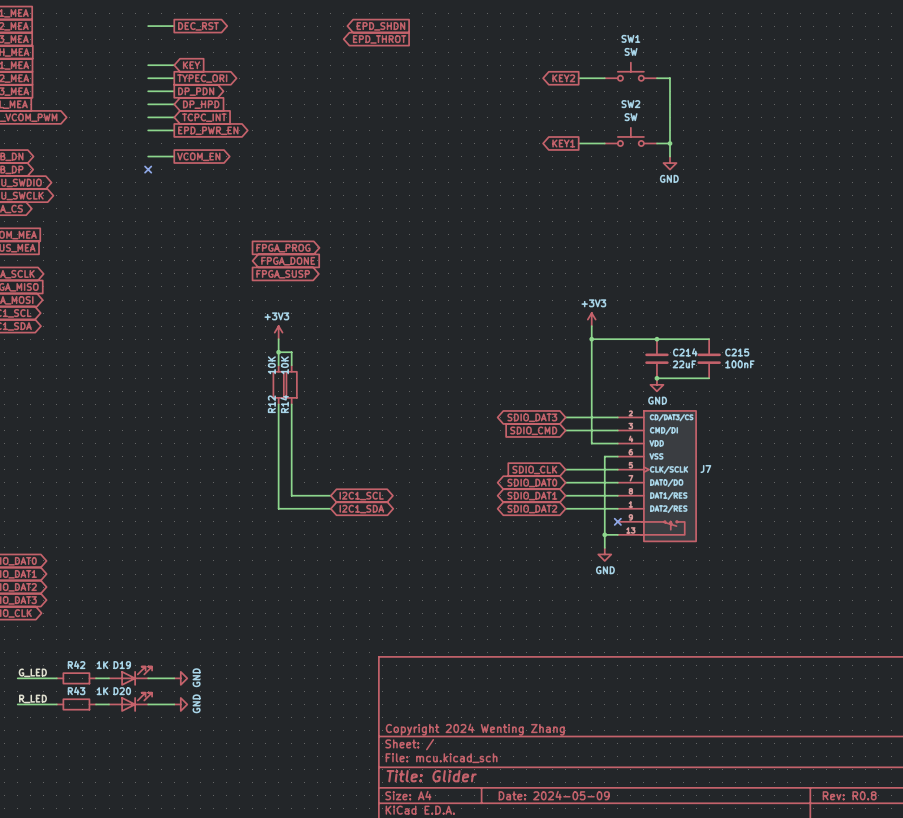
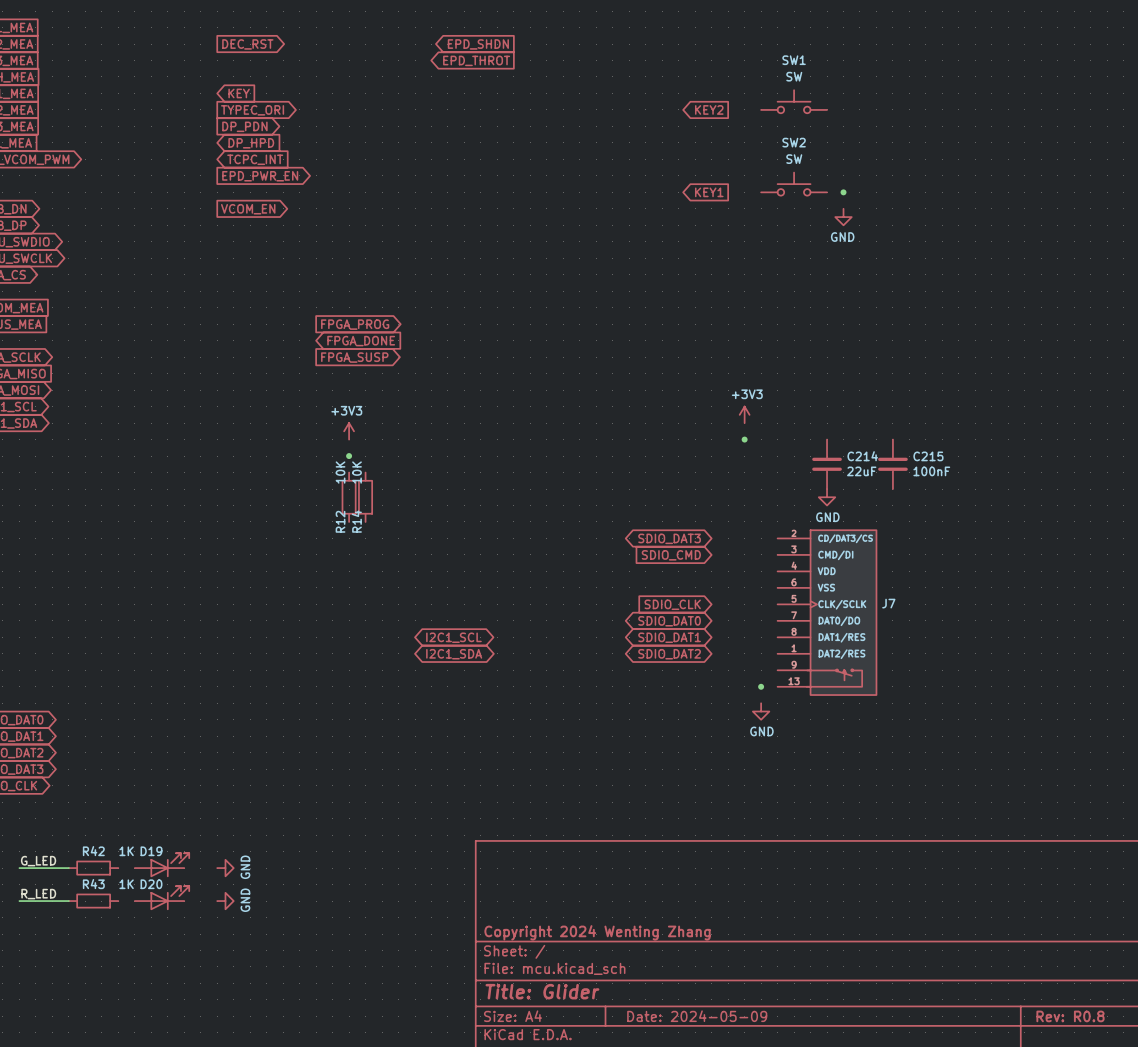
wire: (148, 26) (174, 26) -> none
wire: (148, 65) (174, 65) -> none
wire: (148, 78) (174, 78) -> none
wire: (578, 78) (604, 78) -> none
wire: (656, 78) (670, 78) (670, 156) -> none
wire: (148, 91) (174, 91) -> none
wire: (148, 104) (174, 104) -> none
wire: (148, 117) (174, 117) -> none
wire: (148, 130) (174, 130) -> none
wire: (578, 143) (604, 143) -> none
wire: (656, 143) (670, 143) -> none
wire: (148, 156) (174, 156) -> none
no-connect mark: (148, 169) -> none
wire: (591, 326) (591, 443) (617, 443) -> none
wire: (278, 339) (278, 365) -> none
wire: (591, 339) (709, 339) -> none
junction: (656, 339) -> none
wire: (278, 352) (291, 352) (291, 365) -> none
wire: (656, 378) (709, 378) -> none
junction: (656, 378) -> none
wire: (278, 404) (278, 508) (330, 508) -> none
wire: (291, 404) (291, 495) (330, 495) -> none
wire: (565, 417) (617, 417) -> none
wire: (565, 430) (617, 430) -> none
wire: (617, 456) (604, 456) (604, 547) -> none
wire: (565, 469) (617, 469) -> none
wire: (565, 482) (617, 482) -> none
wire: (565, 495) (617, 495) -> none
wire: (565, 508) (617, 508) -> none
no-connect mark: (617, 521) -> none
wire: (604, 534) (617, 534) -> none
wire: (95, 678) (109, 678) -> none
wire: (148, 678) (174, 678) -> none
wire: (95, 704) (109, 704) -> none
wire: (148, 704) (174, 704) -> none

